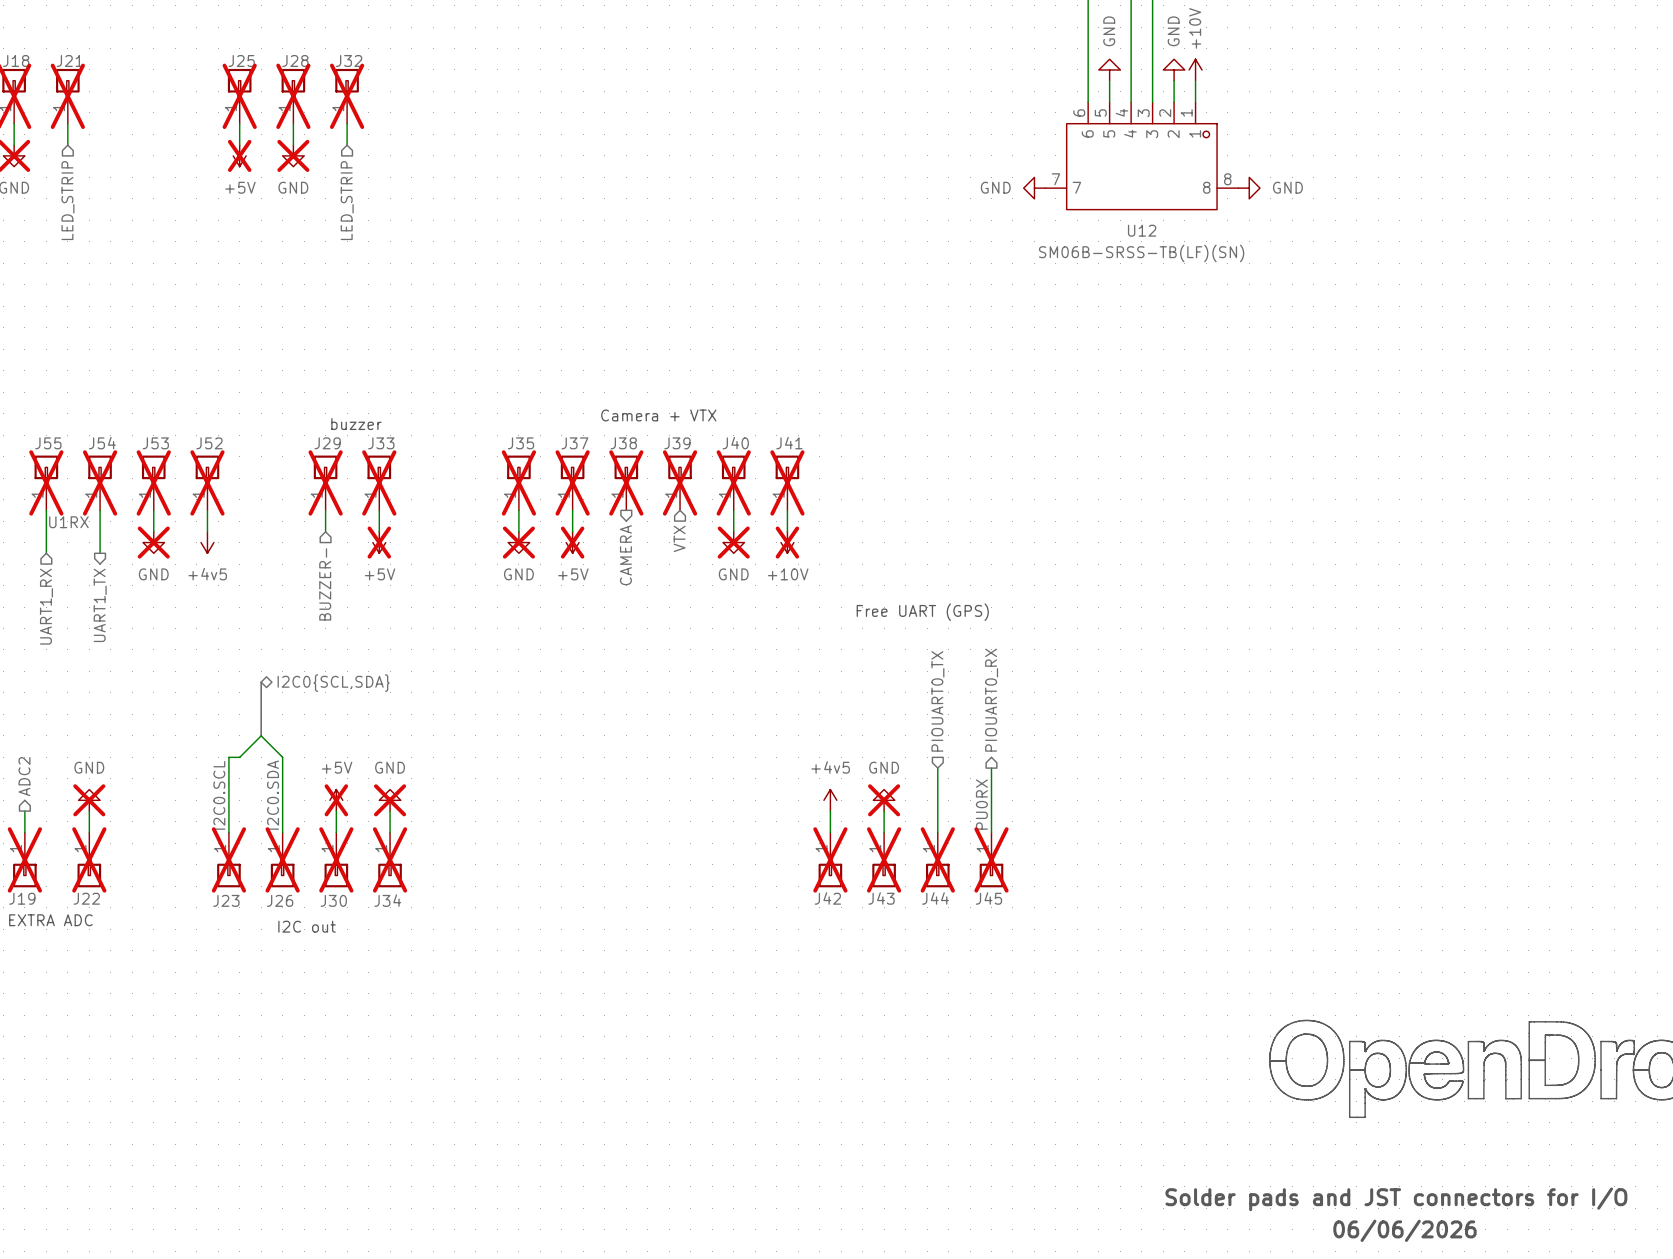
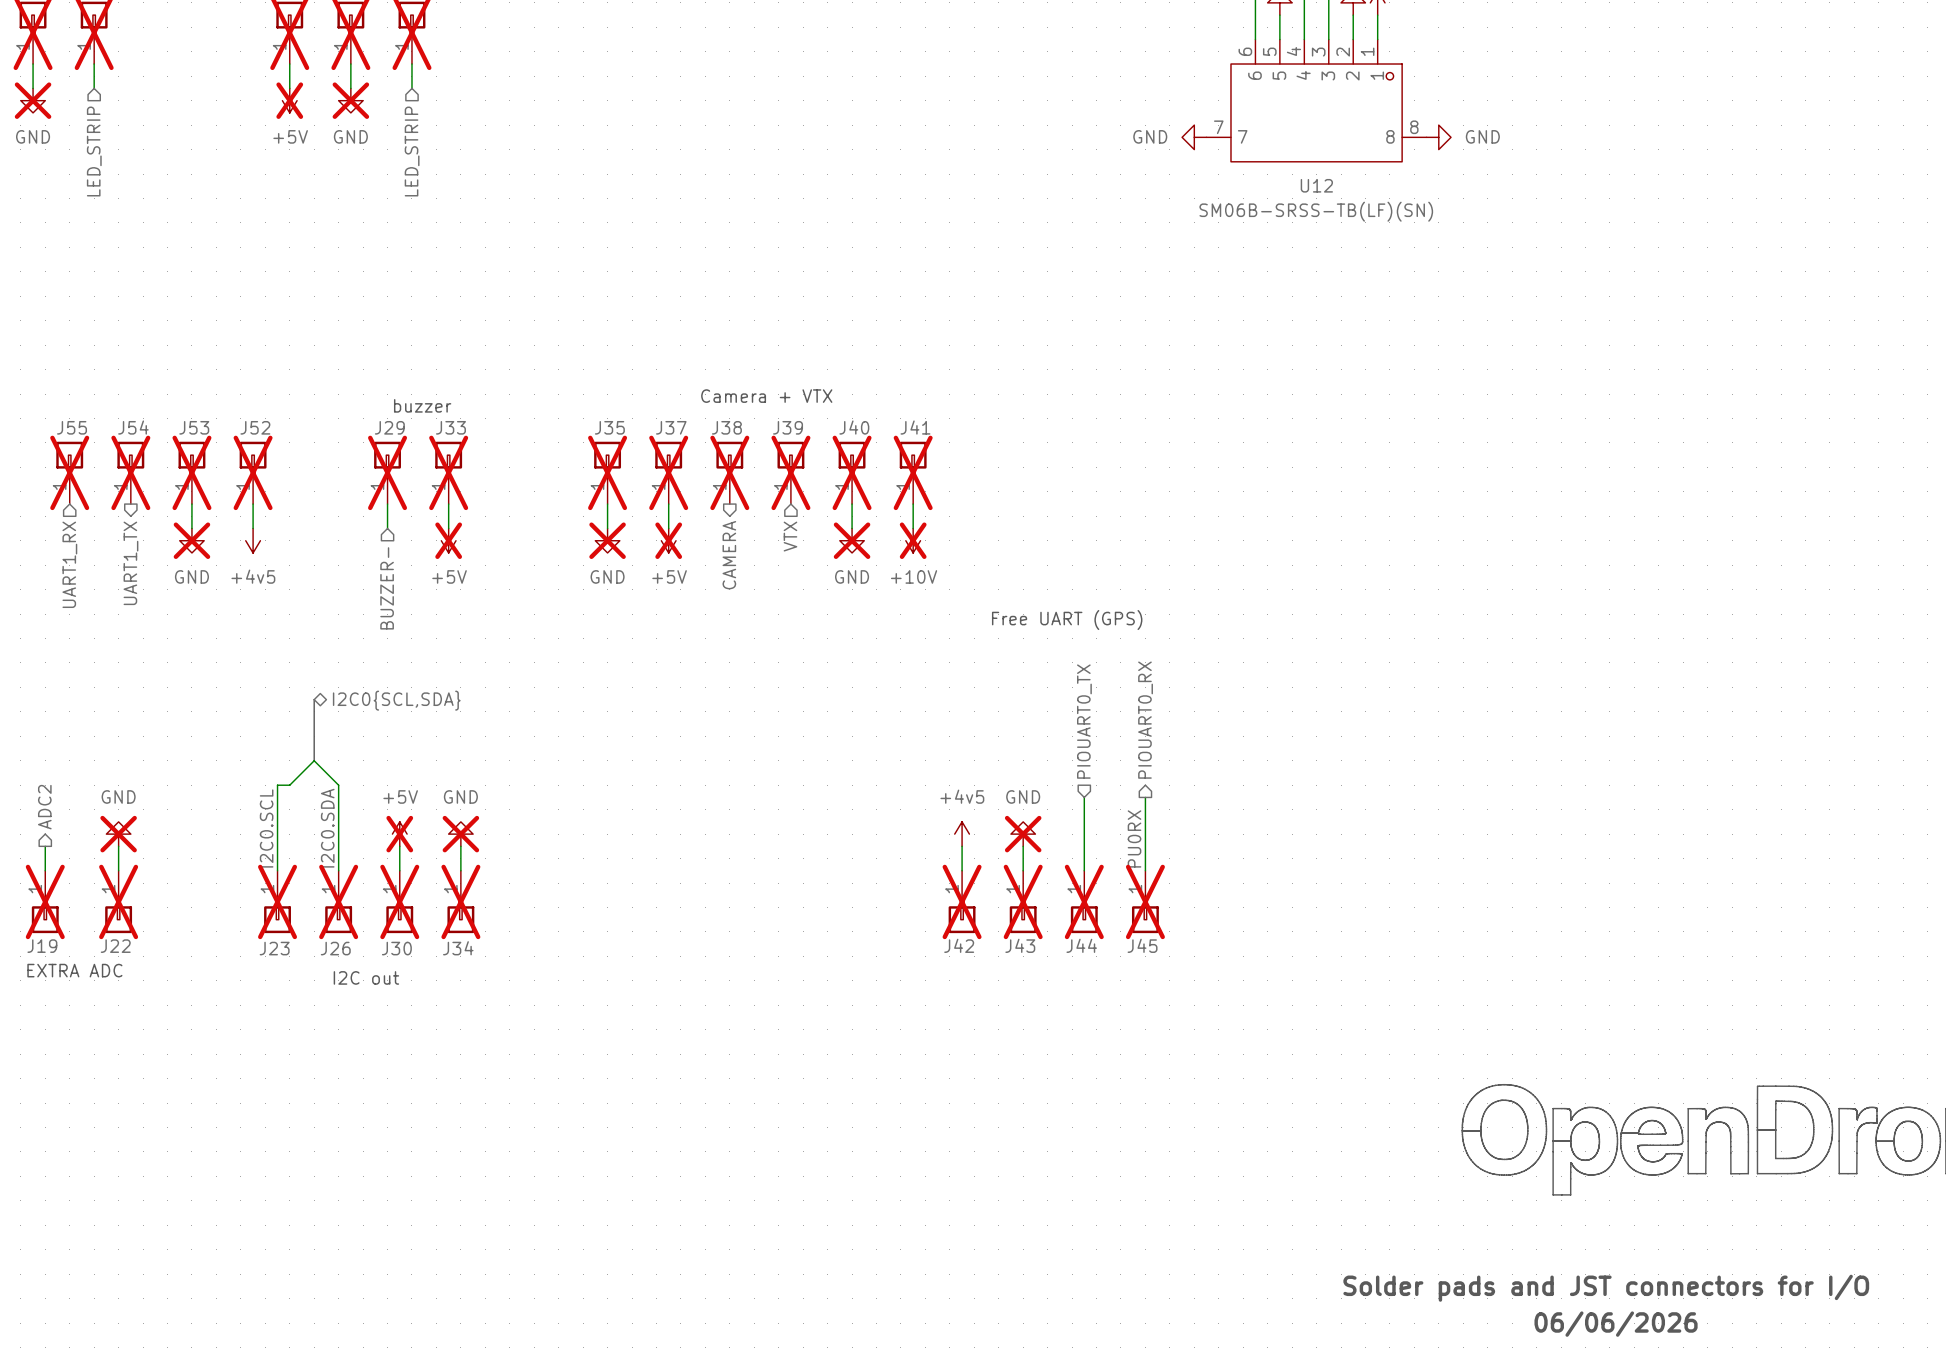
wire: (46, 510) (46, 553) -> none
wire: (100, 510) (100, 553) -> none
label: U1RX (68, 522) -> none
hierarchical label position: UART1_TX (100, 605) -> UART1_TX (130, 563)
hierarchical label position: UART1_RX (46, 606) -> UART1_RX (69, 564)

